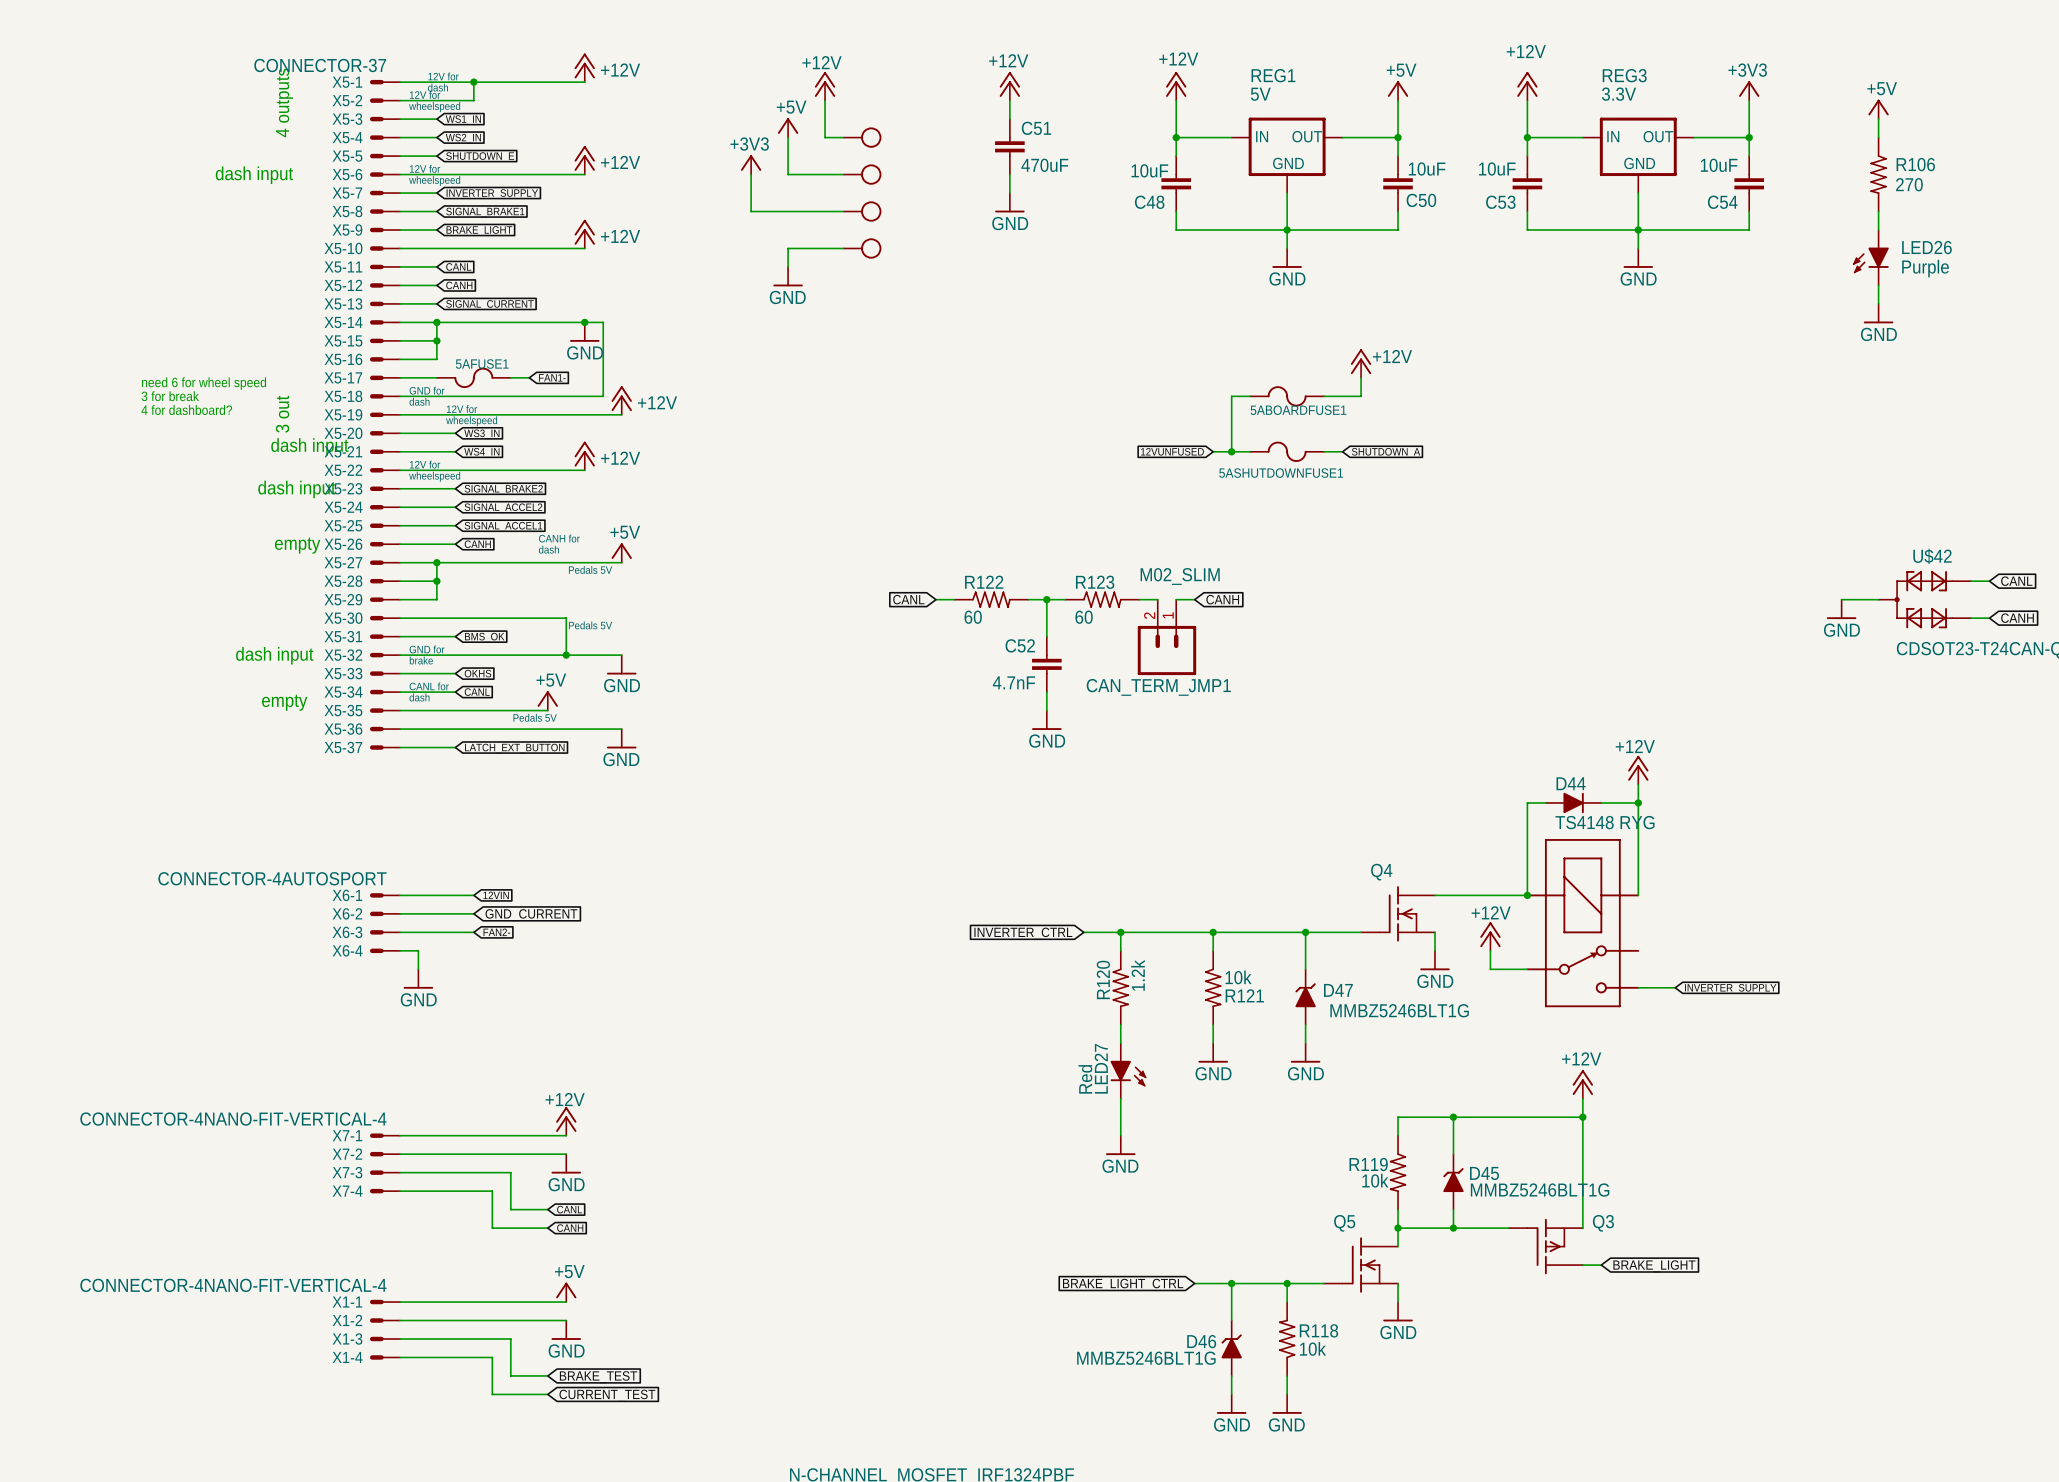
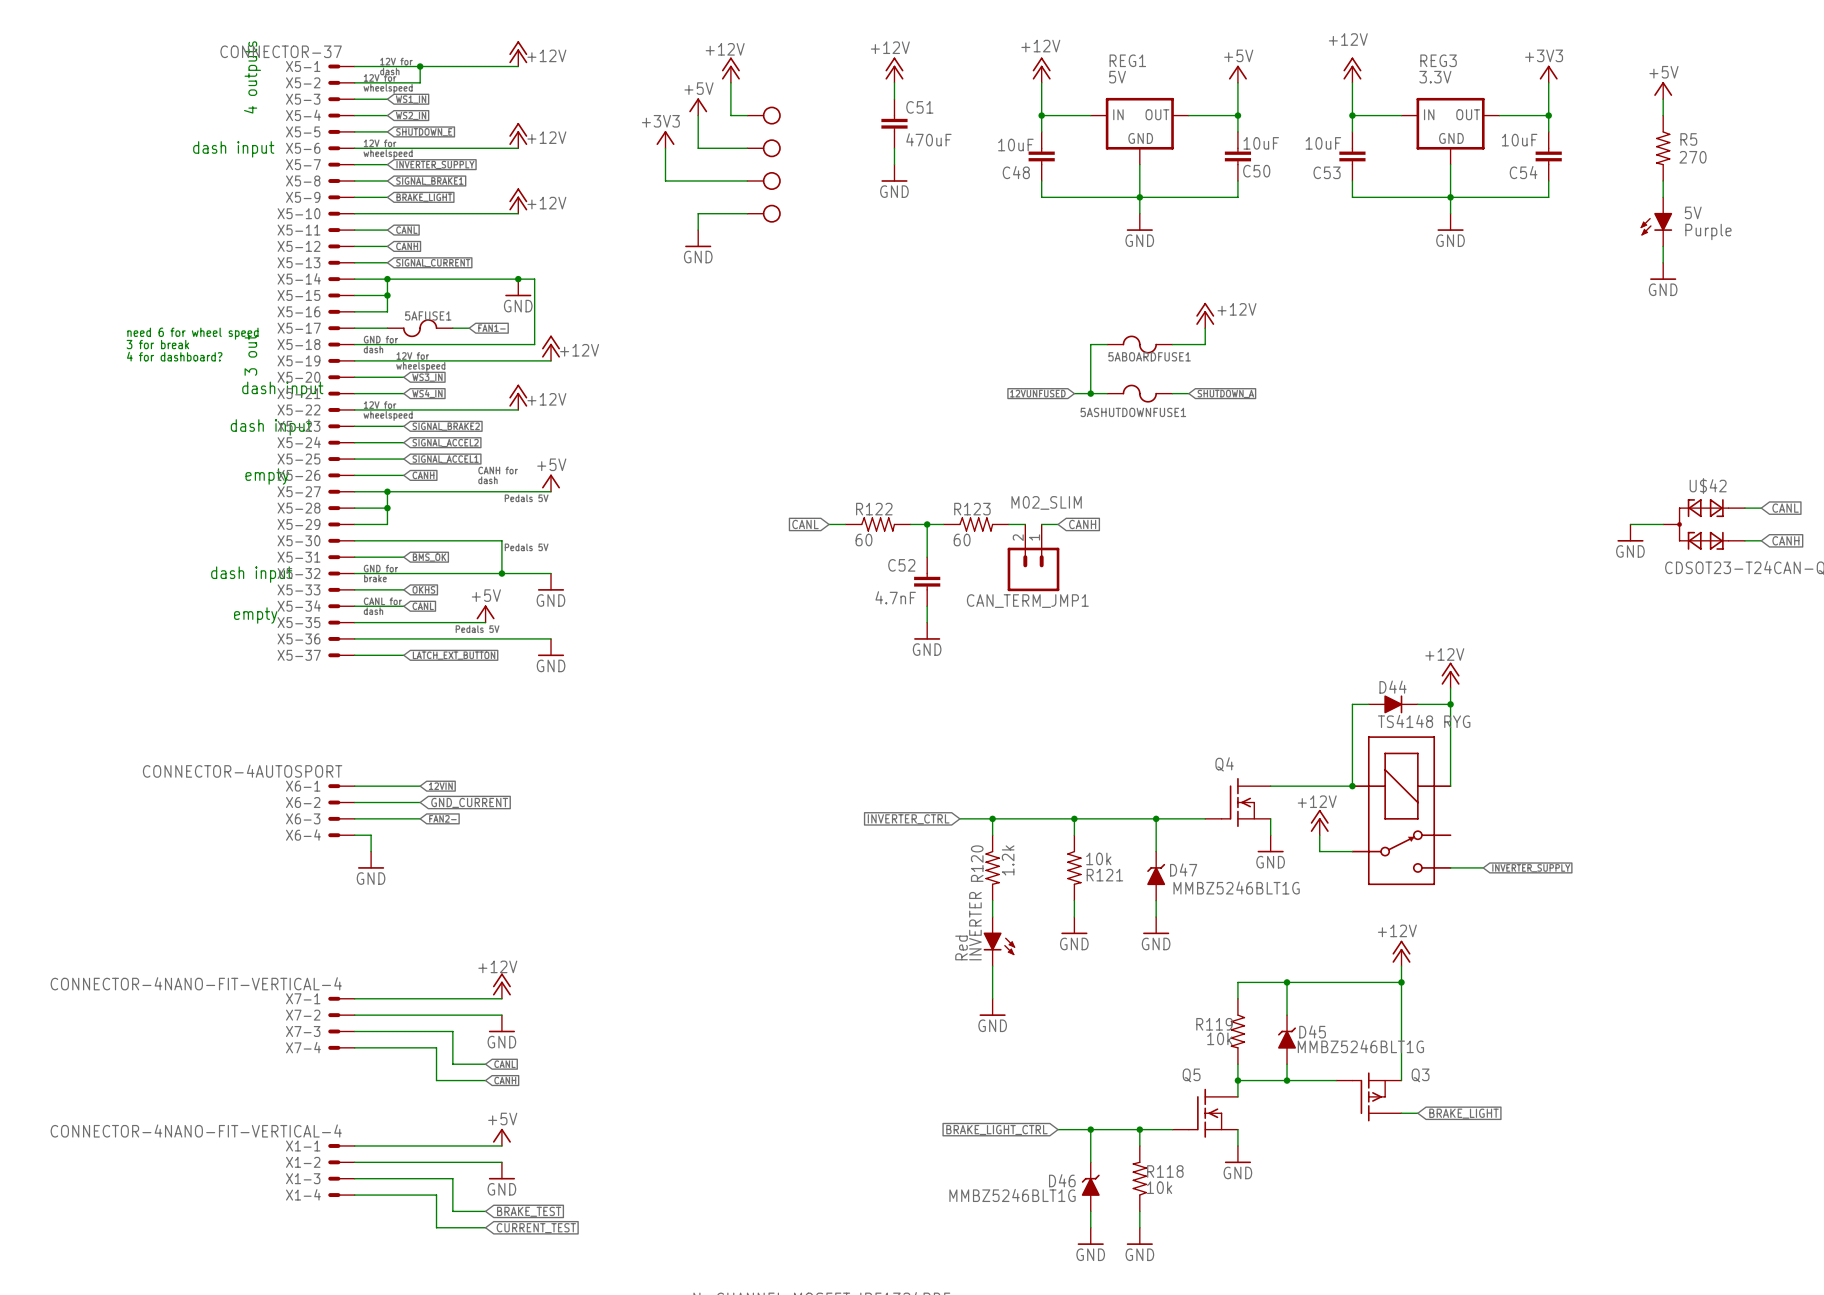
R106 name: R106 (1915, 164) -> R5 (1688, 139)
LED26 name: LED26 (1926, 247) -> 5V (1693, 212)
LED27 name: LED27 (1101, 1068) -> INVERTER (975, 926)

